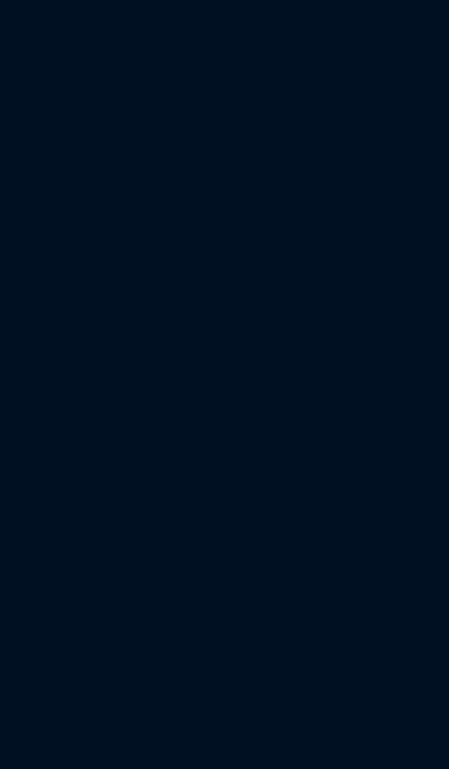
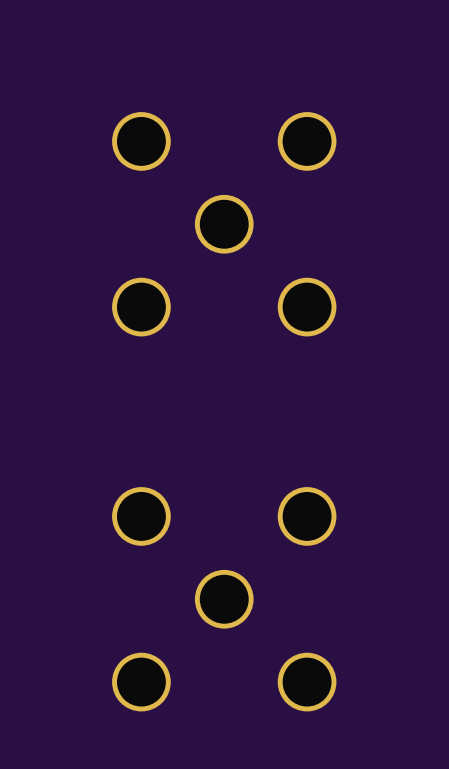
part: none -> (224, 224)
part: none -> (224, 599)

